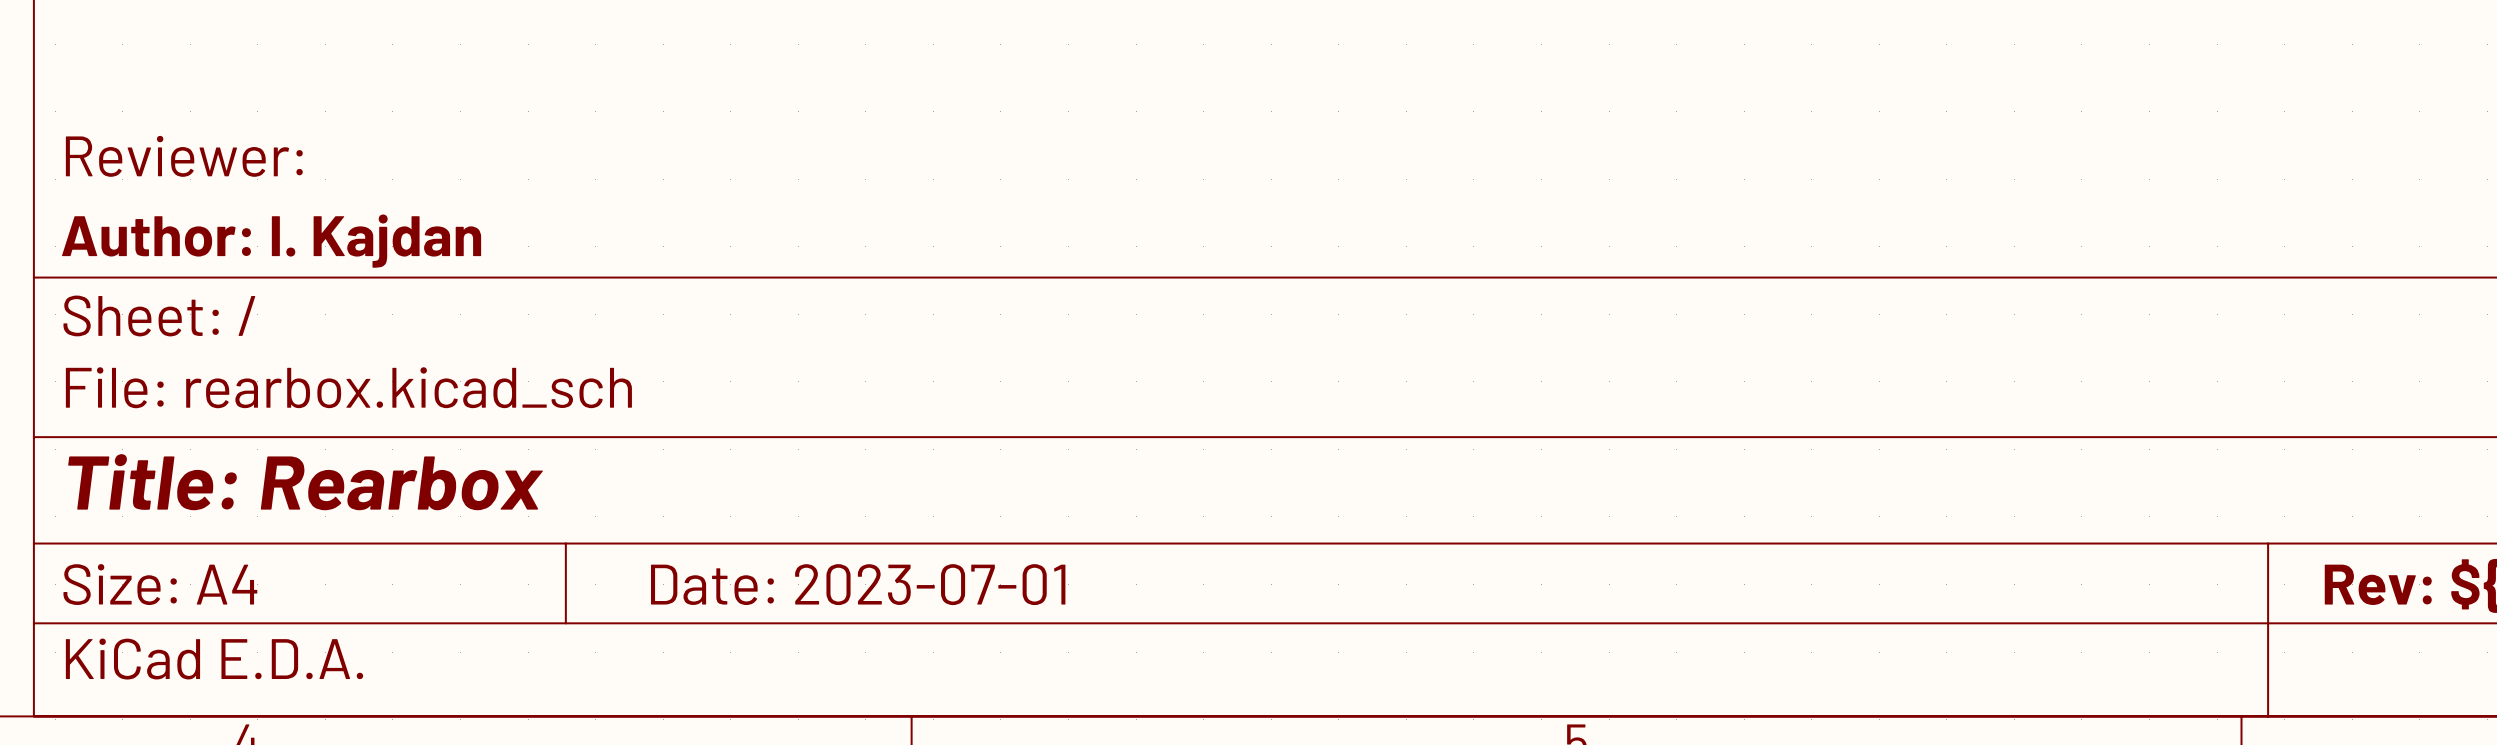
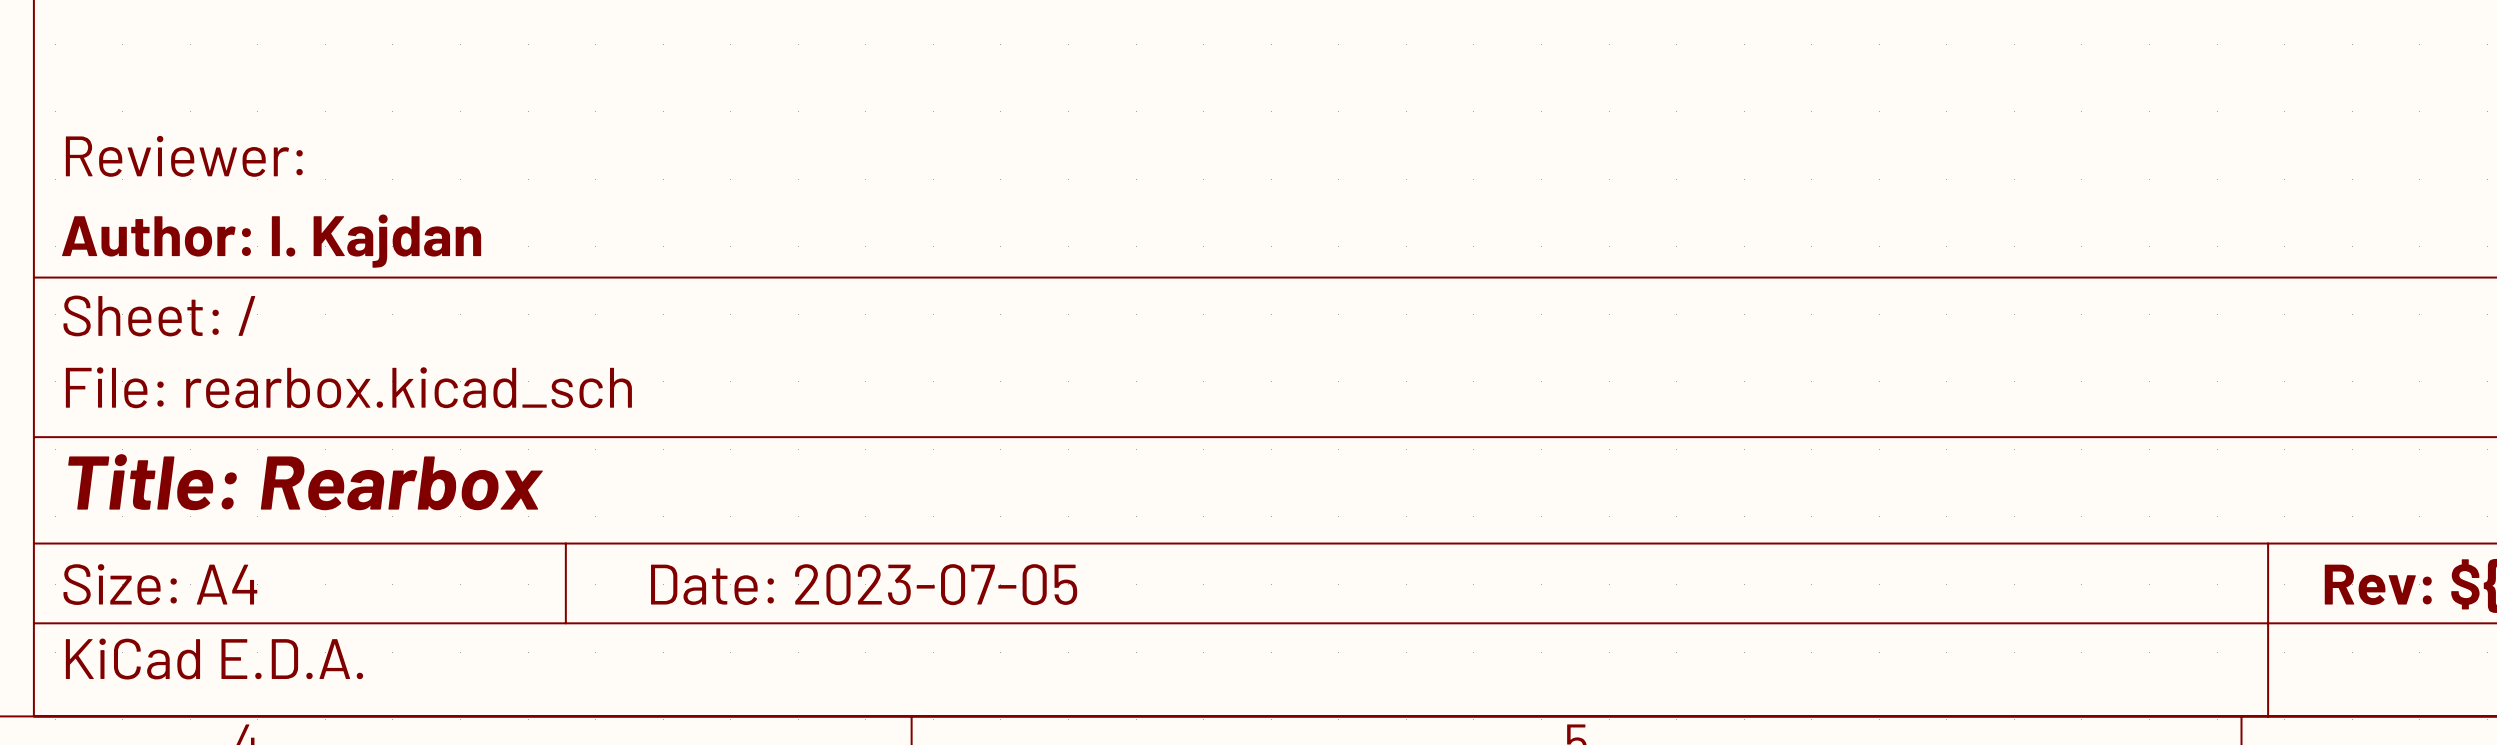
title block: Date: 2023-07-01 (858, 584) -> Date: 2023-07-05 (864, 584)

